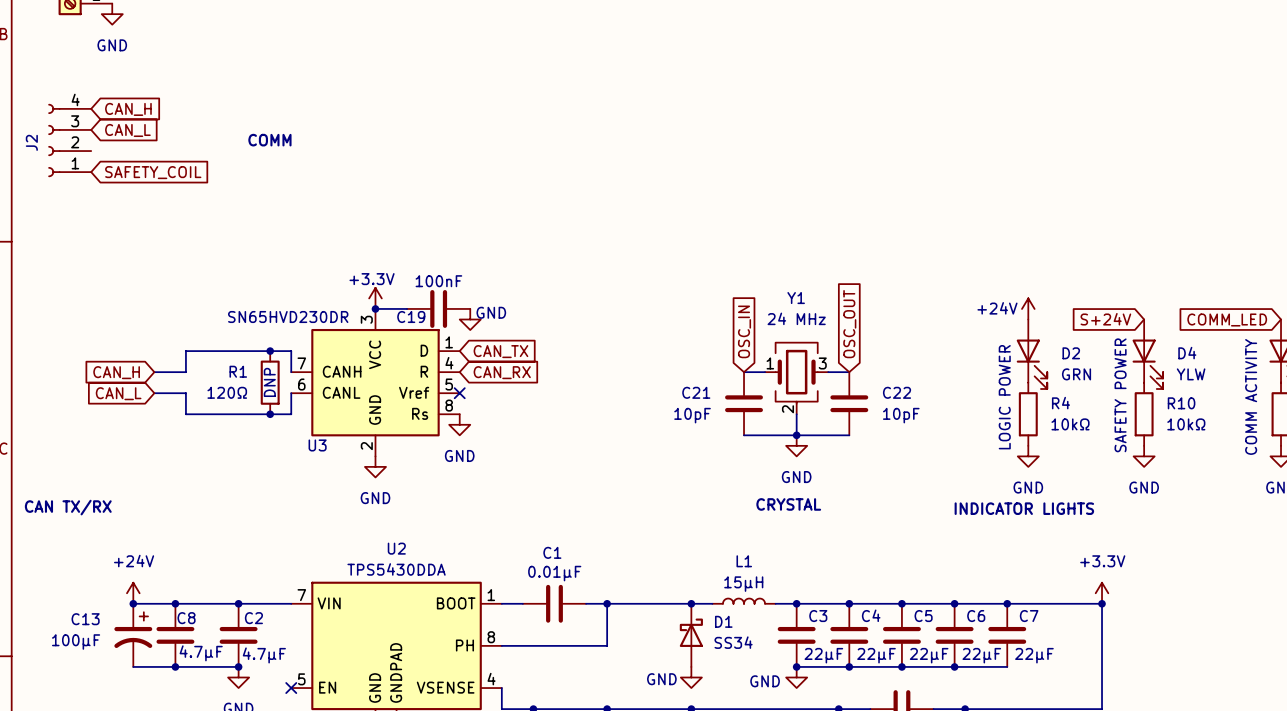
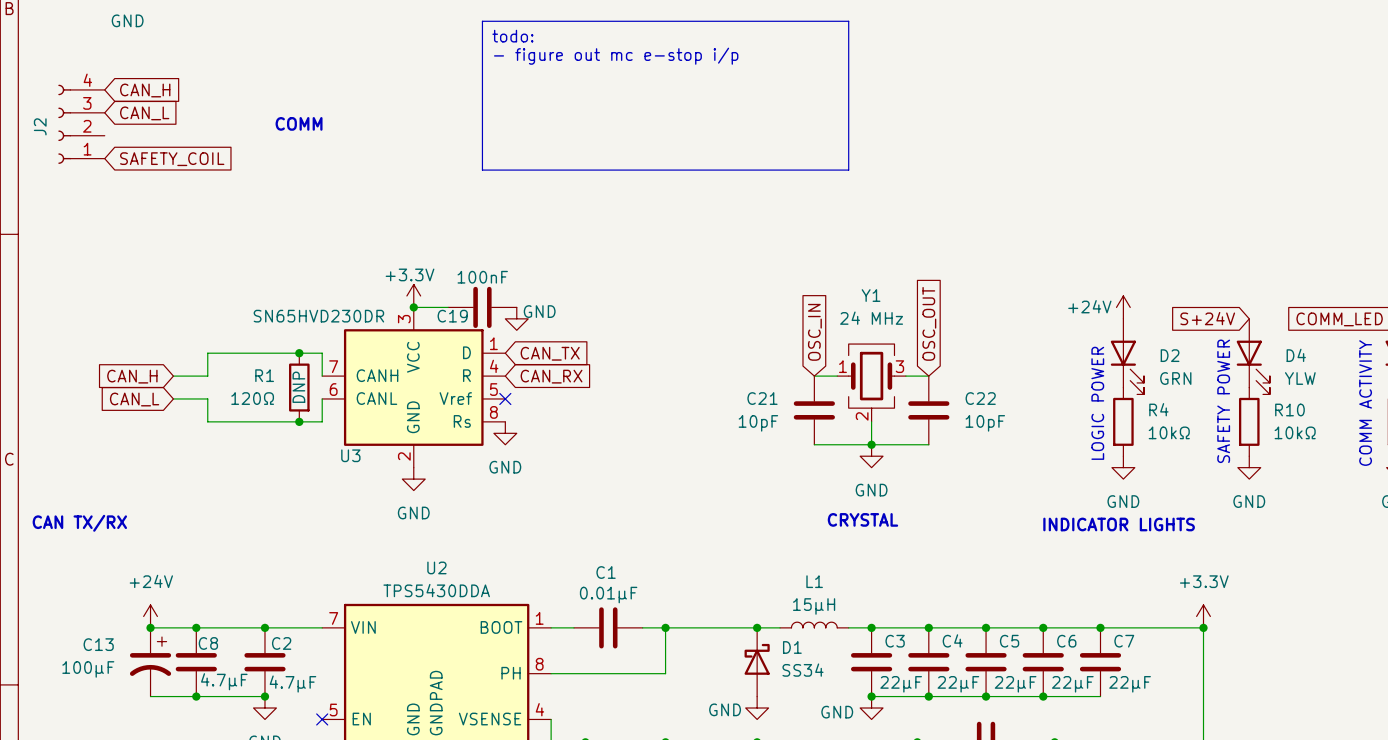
line: none -> (482, 21) (848, 21) (848, 170) (482, 170) (482, 21)
text: none -> todo: (512, 36)
text: none -> - figure out mc e-stop i/p (616, 56)

